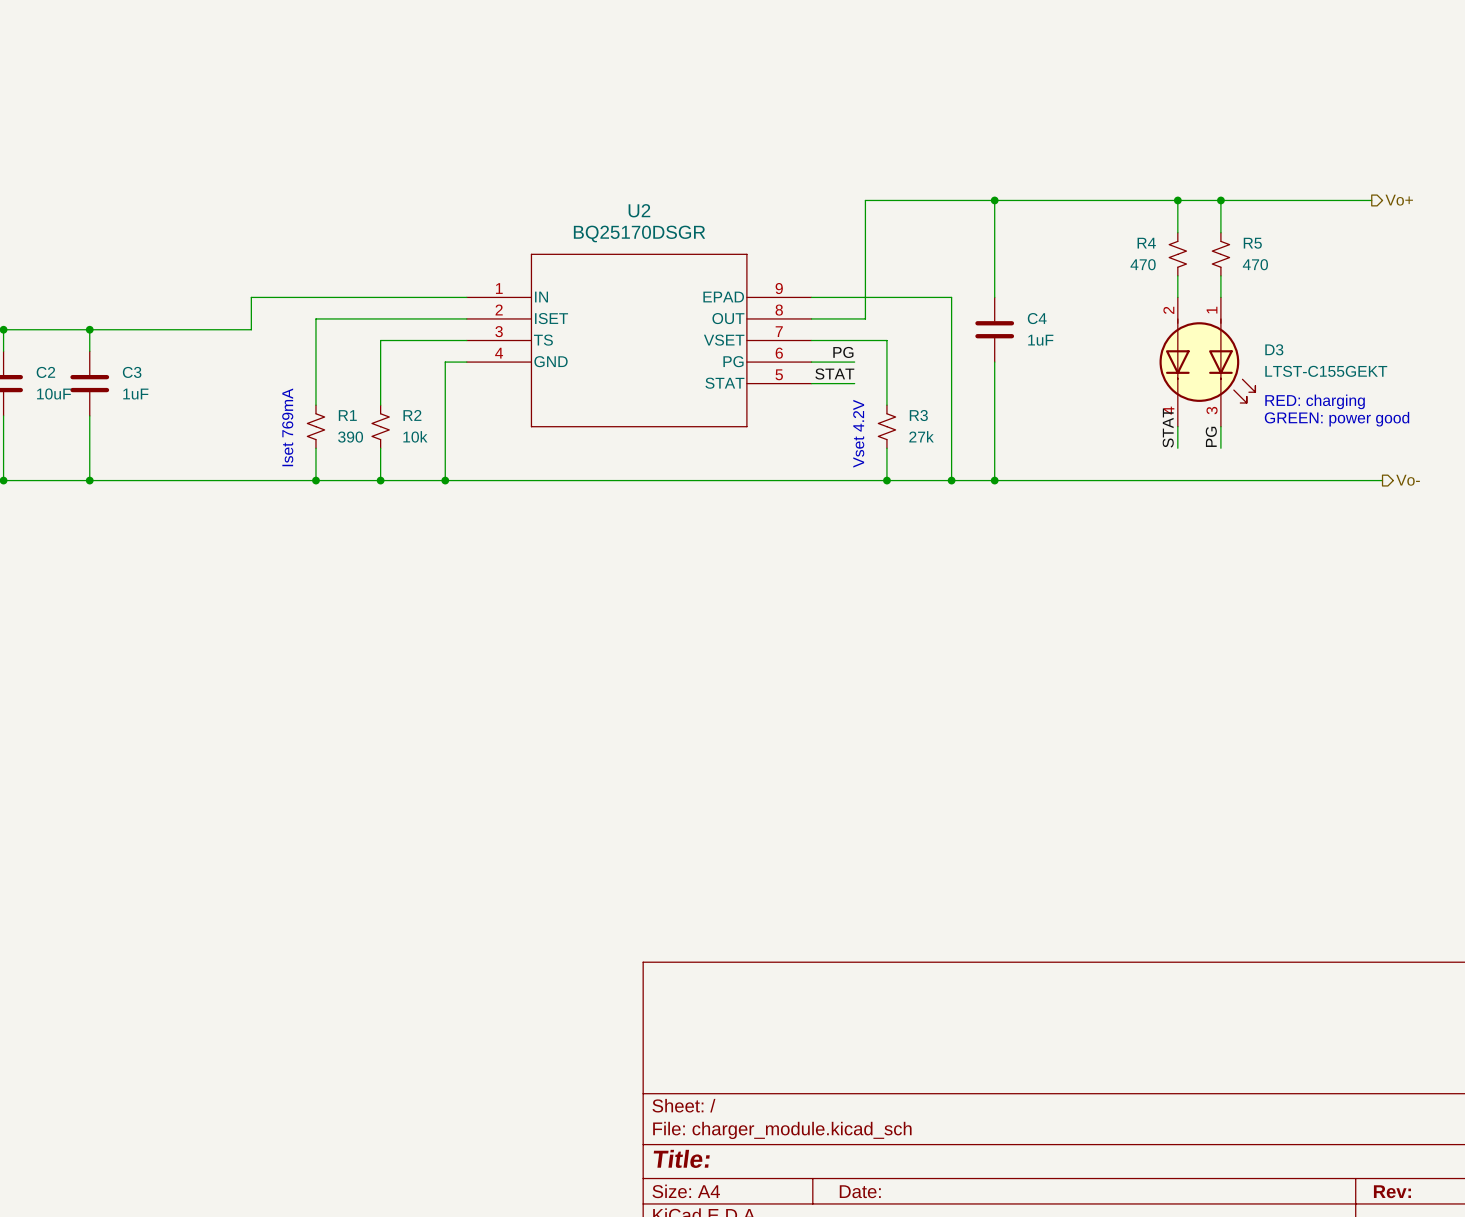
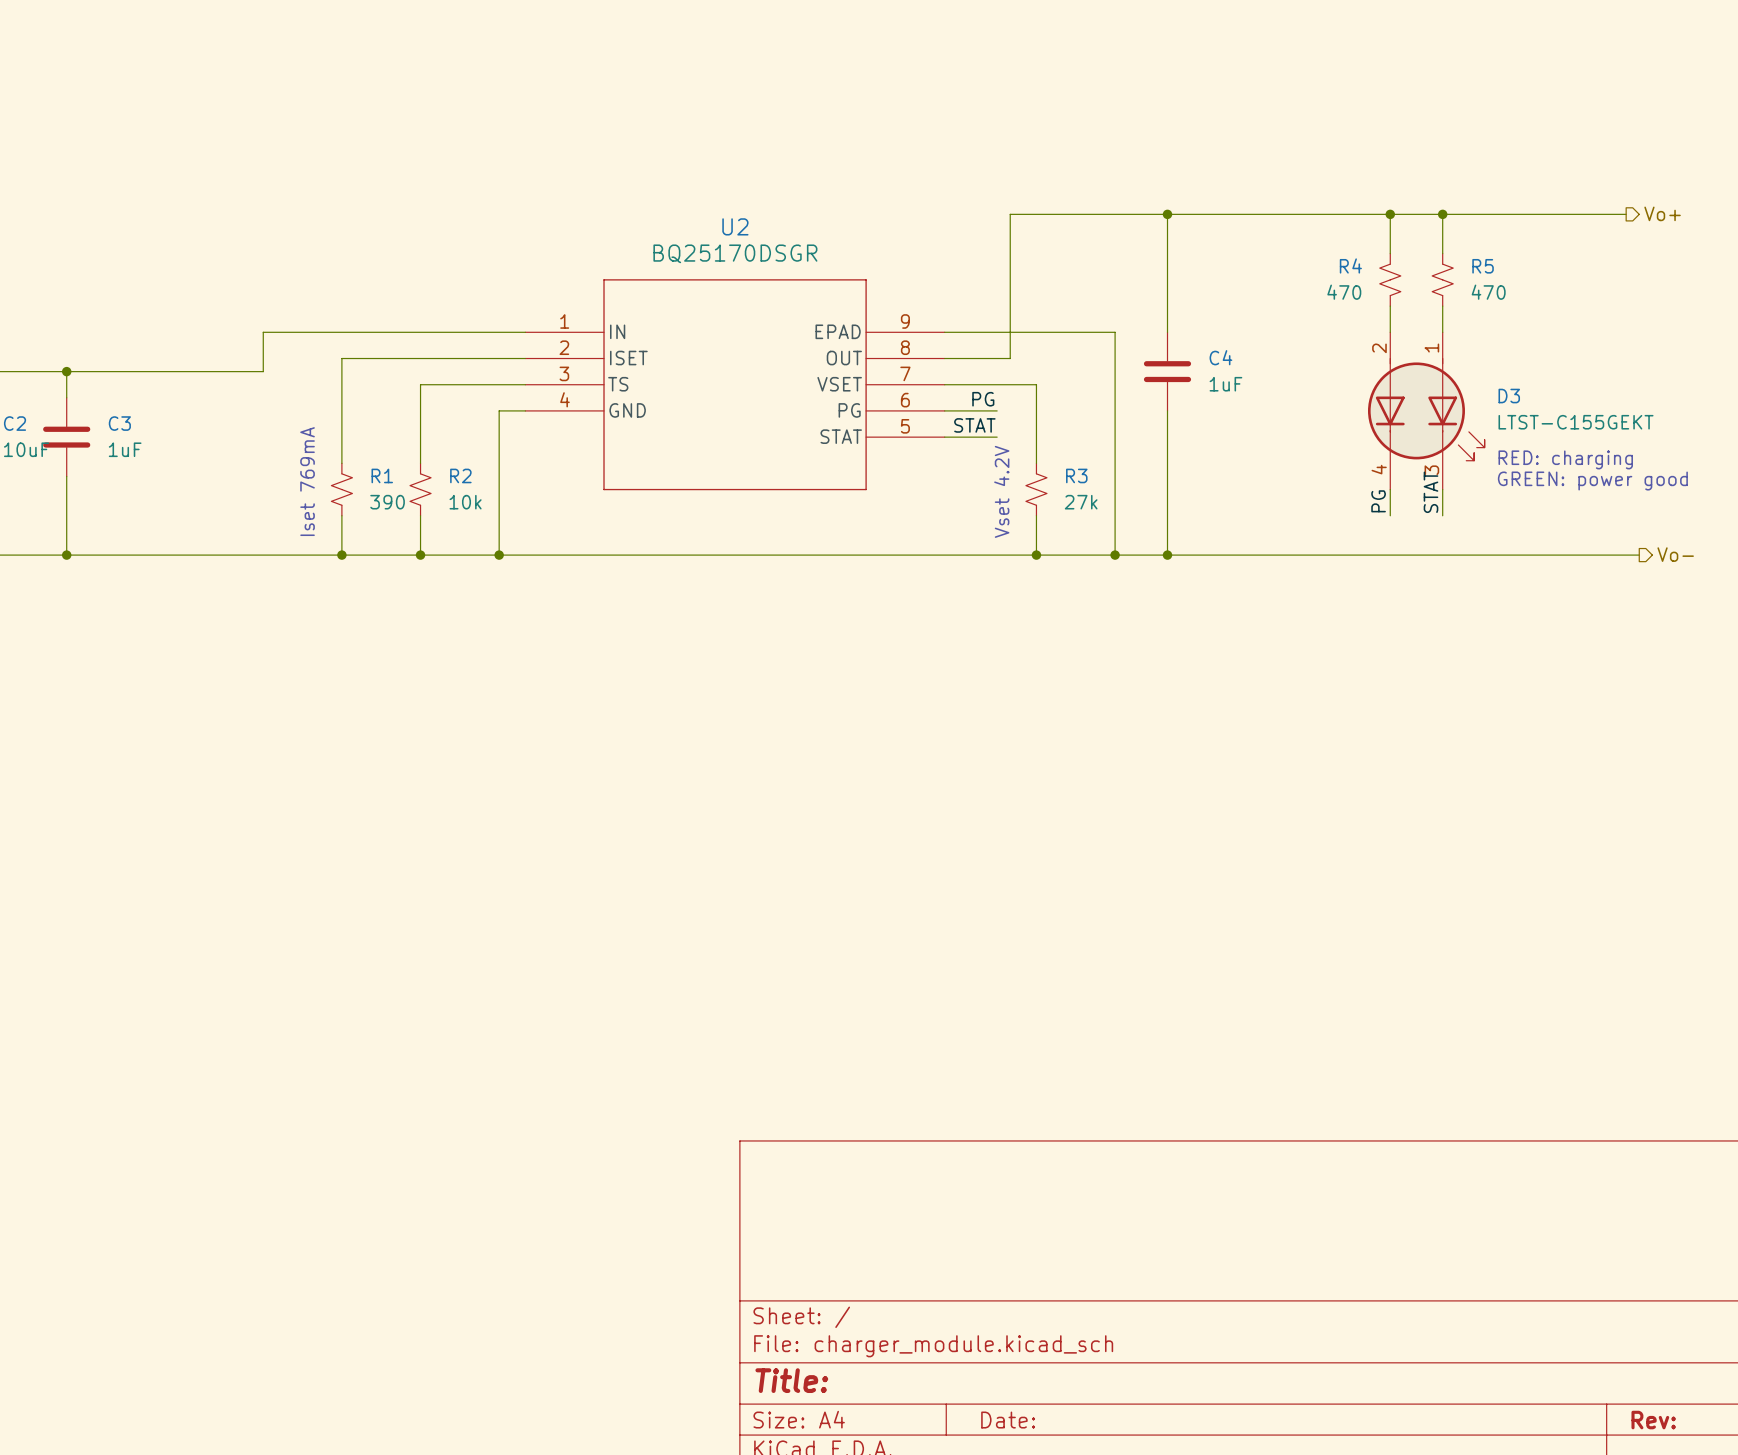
label: STAT (1168, 428) -> PG (1378, 501)
label: PG (1211, 436) -> STAT (1431, 492)

